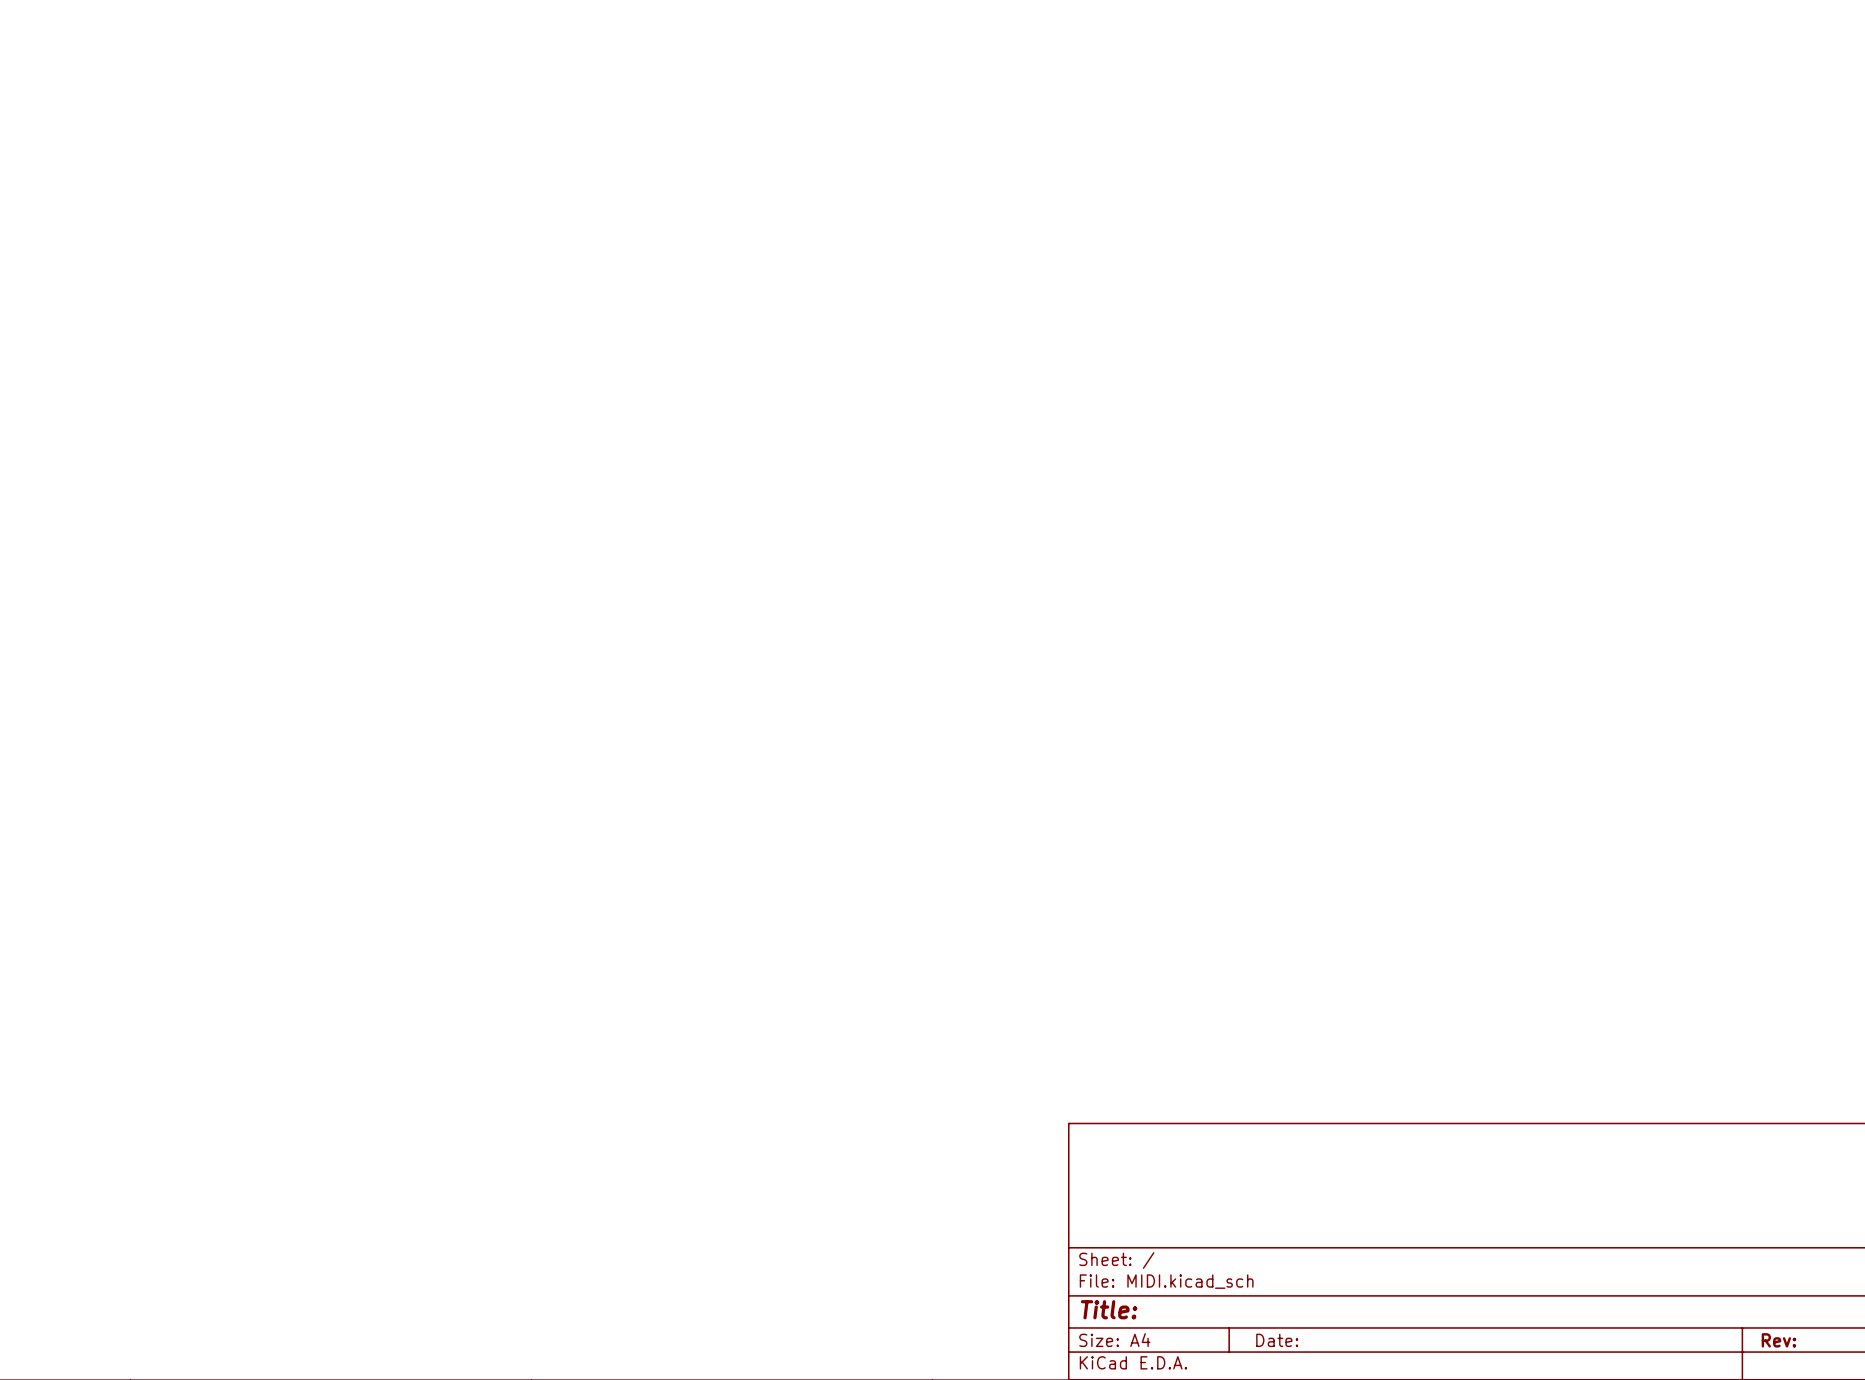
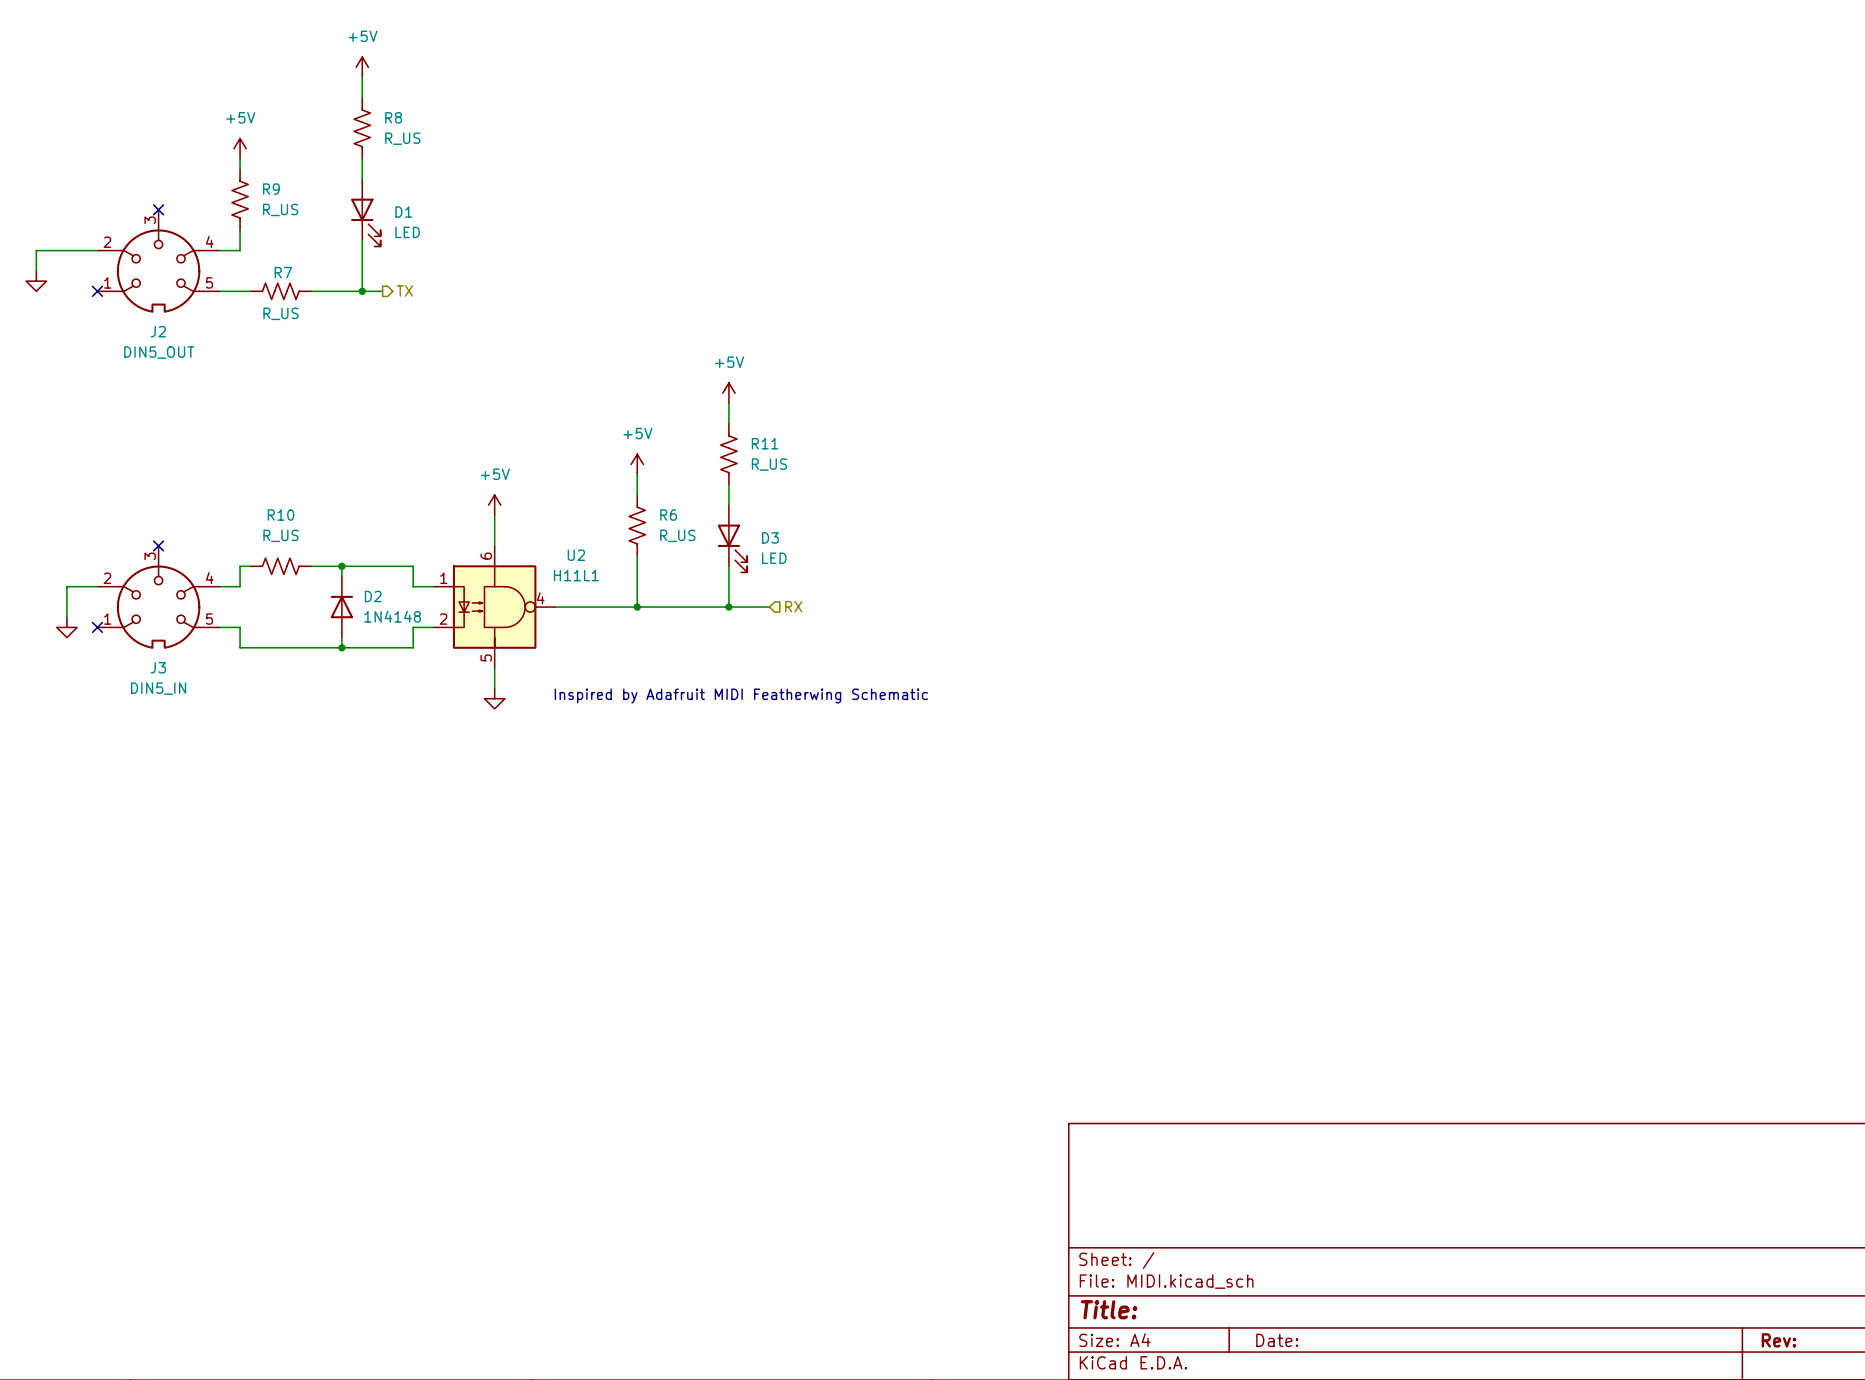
power symbol: none -> +5V (362, 67)
wire: none -> (362, 77) (362, 97)
R8: none -> R_US (362, 128)
power symbol: none -> +5V (240, 148)
wire: none -> (240, 158) (240, 169)
wire: none -> (362, 158) (362, 179)
R9: none -> R_US (240, 199)
no-connect mark: none -> (158, 209)
D1: none -> LED (365, 212)
wire: none -> (240, 230) (240, 250) (219, 250)
wire: none -> (362, 240) (362, 291)
wire: none -> (97, 250) (36, 250) (36, 270)
J2: none -> DIN5_OUT (158, 261)
power symbol: none -> (36, 281)
hierarchical label: none -> TX (404, 290)
no-connect mark: none -> (97, 291)
wire: none -> (219, 291) (250, 291)
R7: none -> R_US (280, 291)
wire: none -> (311, 291) (382, 291)
junction: none -> (362, 291)
power symbol: none -> +5V (728, 393)
wire: none -> (728, 403) (728, 423)
R11: none -> R_US (728, 454)
power symbol: none -> +5V (637, 464)
wire: none -> (637, 474) (637, 495)
wire: none -> (728, 484) (728, 505)
power symbol: none -> +5V (494, 505)
wire: none -> (494, 515) (494, 545)
R6: none -> R_US (637, 525)
D3: none -> LED (732, 538)
no-connect mark: none -> (158, 545)
wire: none -> (637, 556) (637, 607)
wire: none -> (250, 566) (240, 566) (240, 586) (219, 586)
R10: none -> R_US (280, 566)
wire: none -> (311, 566) (413, 566) (413, 586) (433, 586)
wire: none -> (341, 566) (341, 576)
junction: none -> (341, 566)
wire: none -> (728, 566) (728, 607)
wire: none -> (97, 586) (66, 586) (66, 617)
J3: none -> DIN5_IN (158, 597)
hierarchical label: none -> RX (793, 606)
D2: none -> 1N4148 (341, 607)
U2: none -> H11L1 (494, 607)
wire: none -> (555, 607) (769, 607)
junction: none -> (637, 607)
junction: none -> (728, 607)
power symbol: none -> (66, 627)
no-connect mark: none -> (97, 627)
wire: none -> (219, 627) (240, 627) (240, 647) (413, 647) (413, 627) (433, 627)
wire: none -> (341, 637) (341, 647)
junction: none -> (341, 647)
wire: none -> (494, 668) (494, 688)
text: none -> Inspired by Adafruit MIDI Featherwing Schematic (741, 695)
power symbol: none -> (494, 698)

